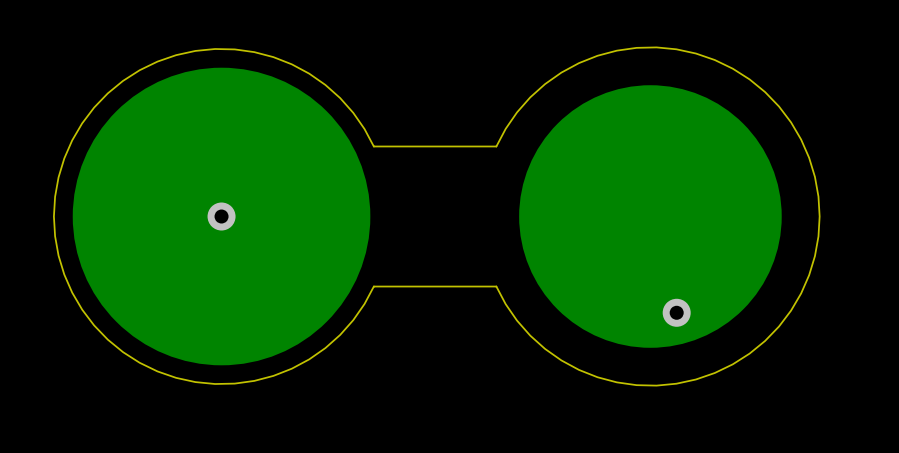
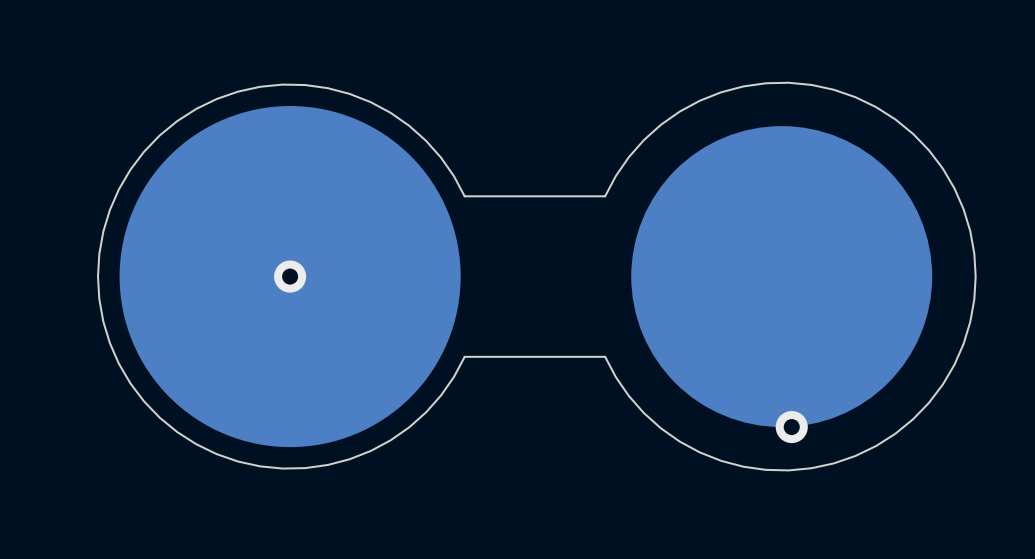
via position: (676, 312) -> (791, 427)

